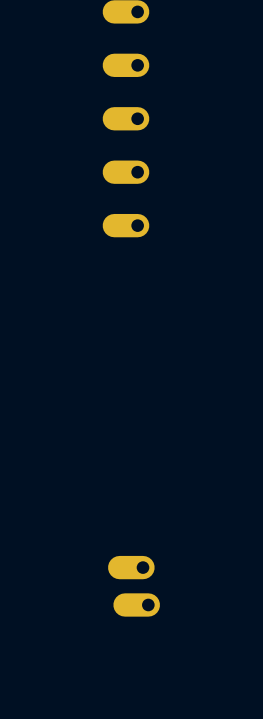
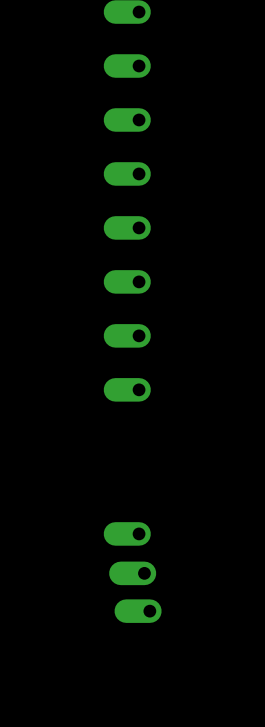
part: none -> (127, 281)
part: none -> (127, 335)
part: none -> (127, 389)
part: none -> (127, 533)

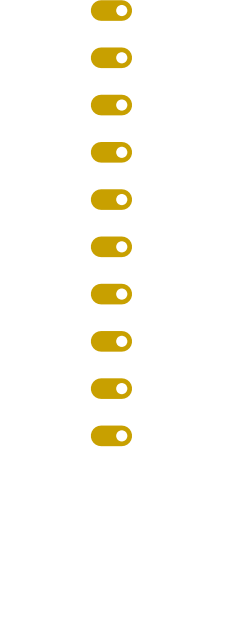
part: none -> (111, 388)
part position: (127, 533) -> (111, 435)
part: (132, 573) -> none
part: (138, 611) -> none

